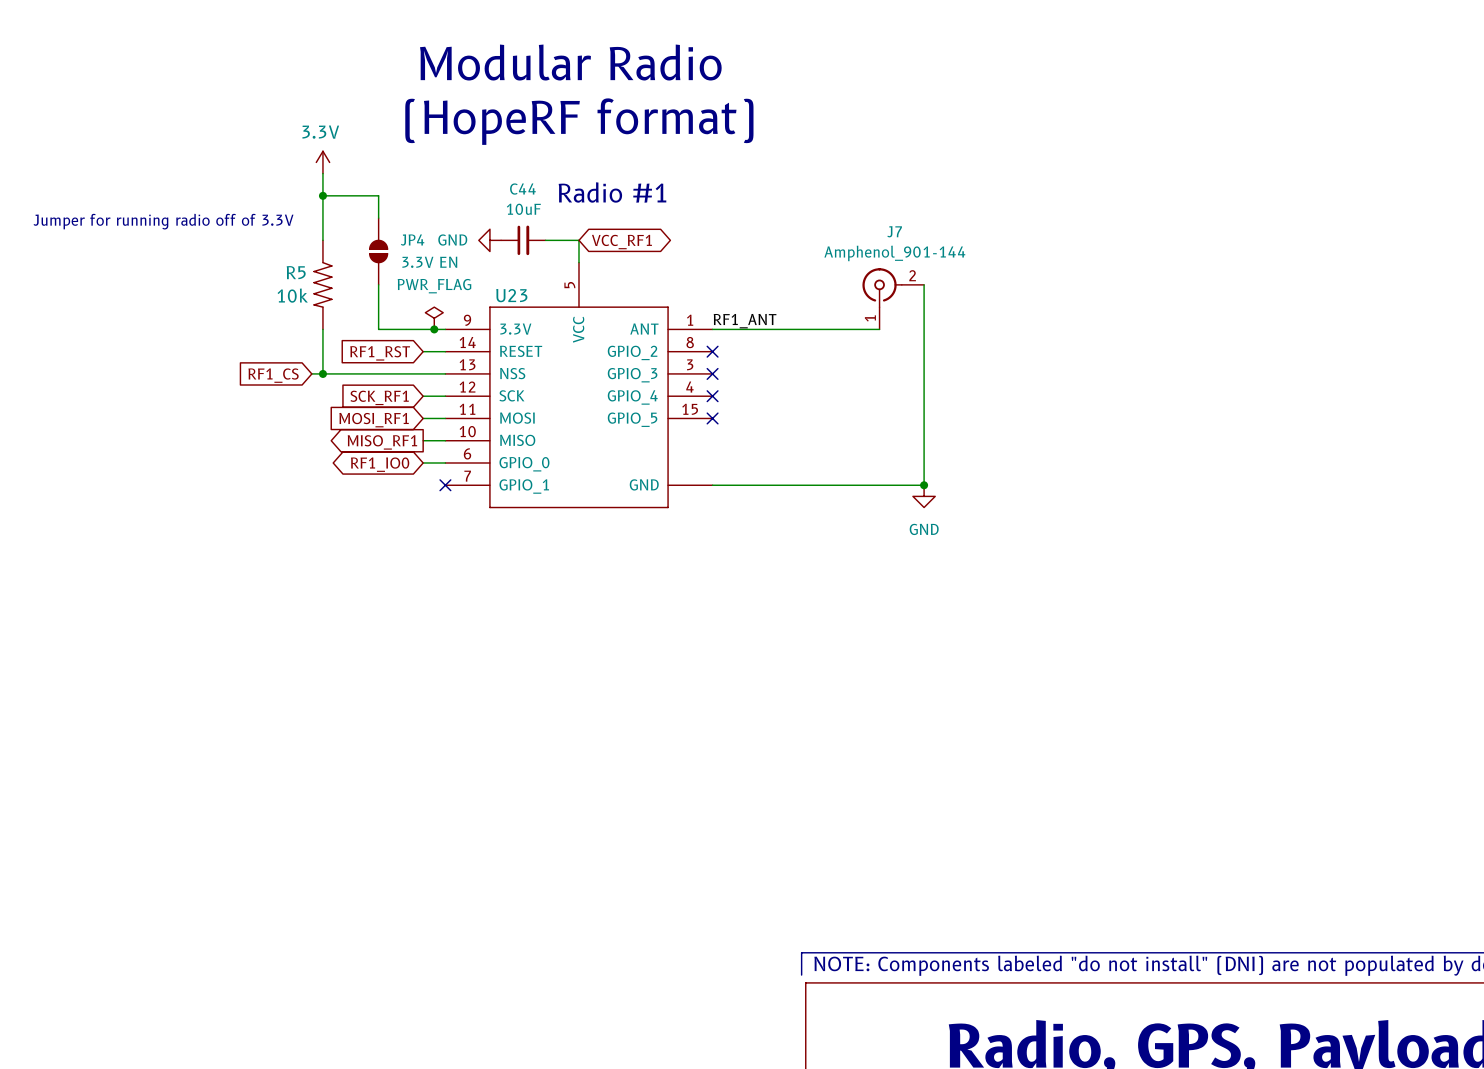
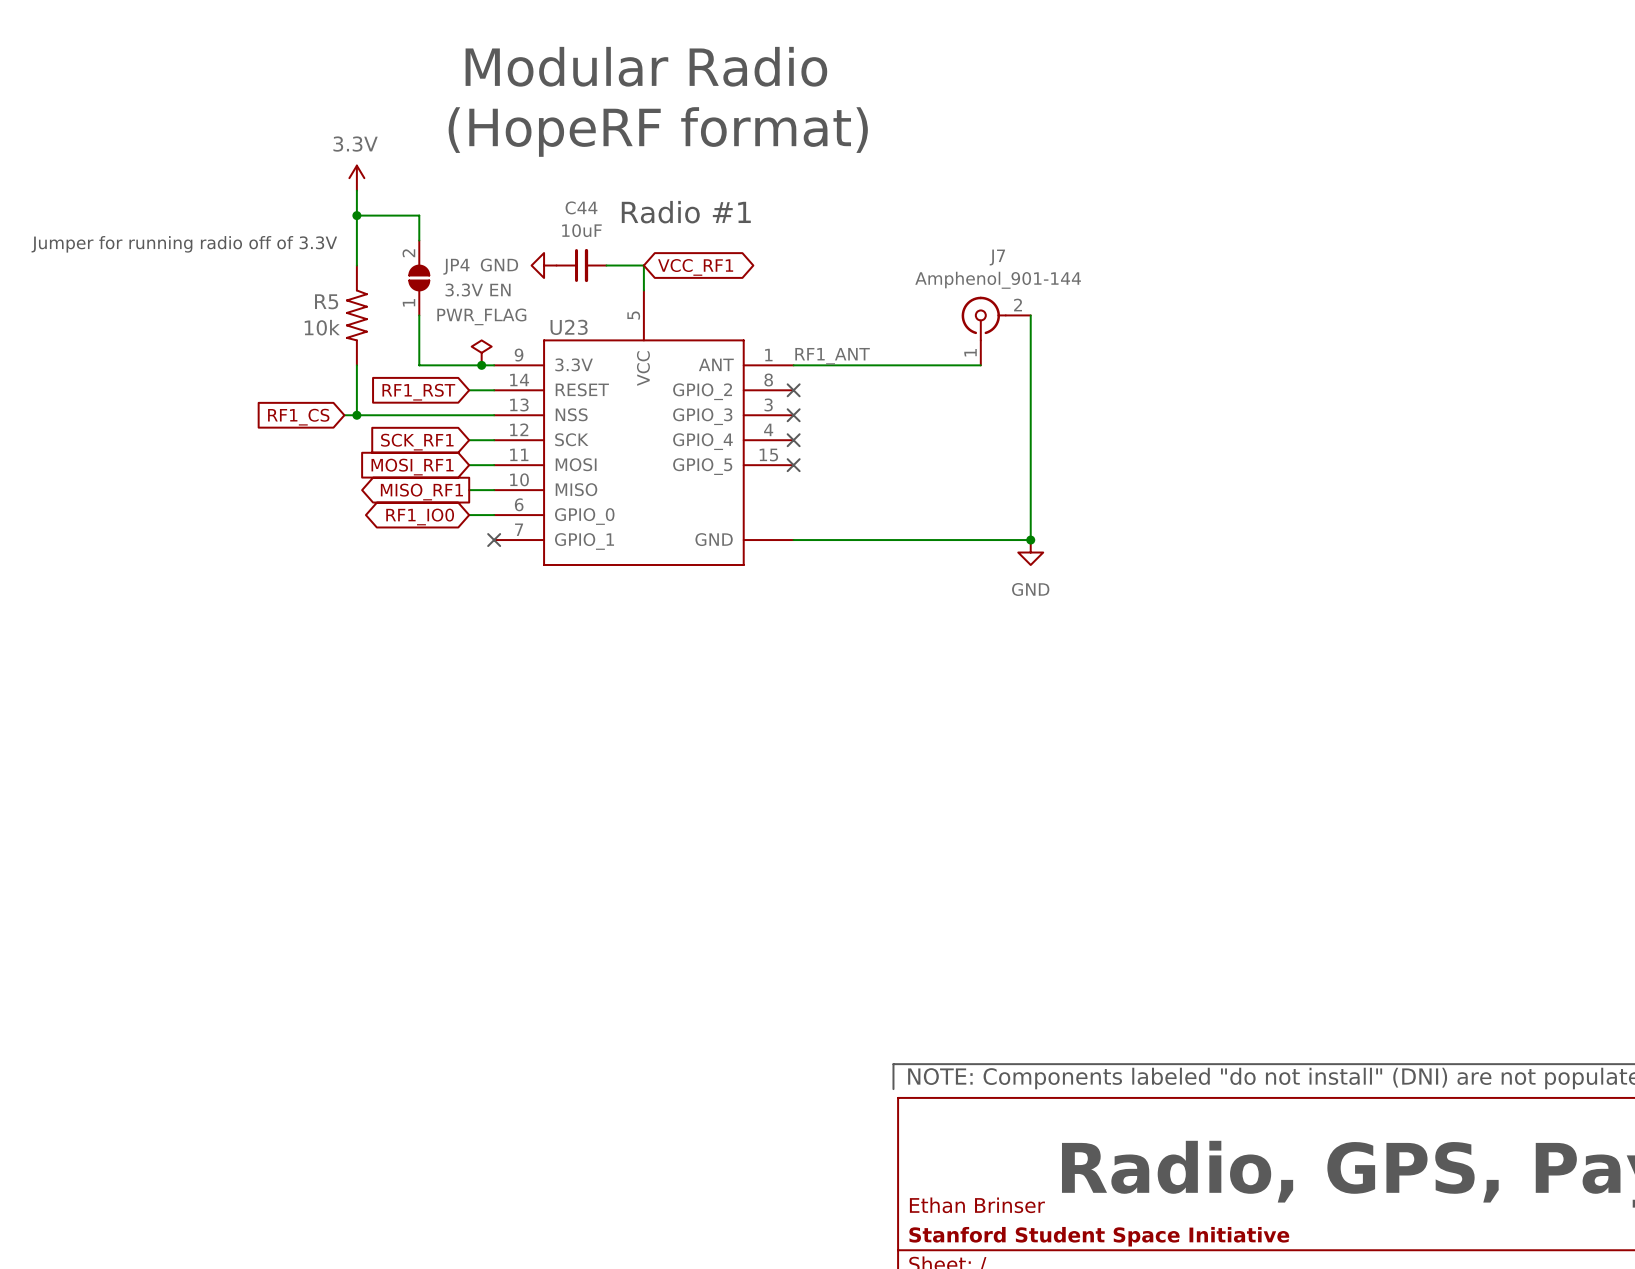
JP4 pin number: none -> 2 (408, 253)
JP4 pin number: none -> 1 (408, 302)

